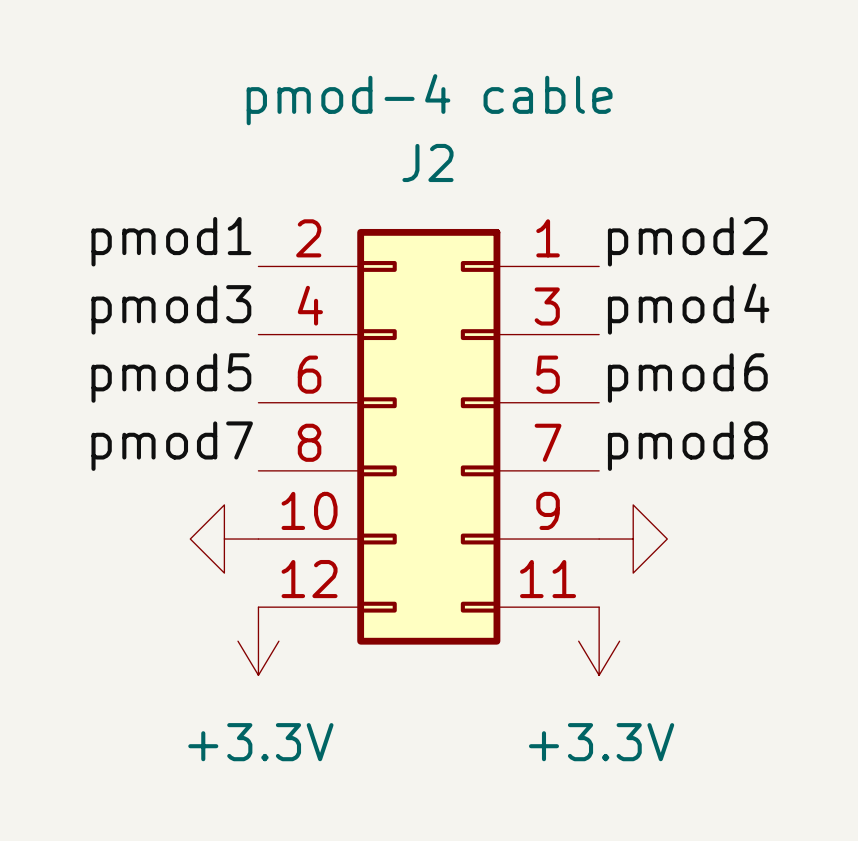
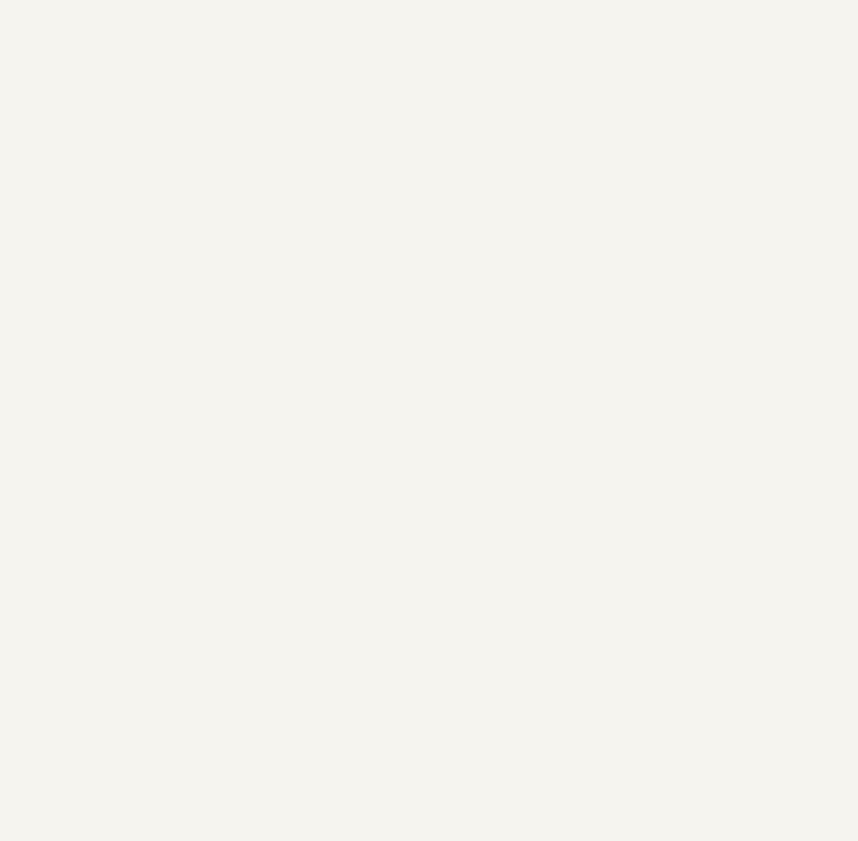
label: pmod1 (171, 241) -> none
label: pmod2 (687, 241) -> none
label: pmod3 (171, 309) -> none
label: pmod4 (688, 309) -> none
label: pmod5 (171, 378) -> none
label: pmod6 (687, 378) -> none
J2: pmod-4 cable (428, 436) -> none
label: pmod7 (172, 446) -> none
label: pmod8 (687, 446) -> none
power symbol: (224, 539) -> none
power symbol: (633, 539) -> none
power symbol: +3.3V (258, 641) -> none
power symbol: +3.3V (599, 641) -> none

